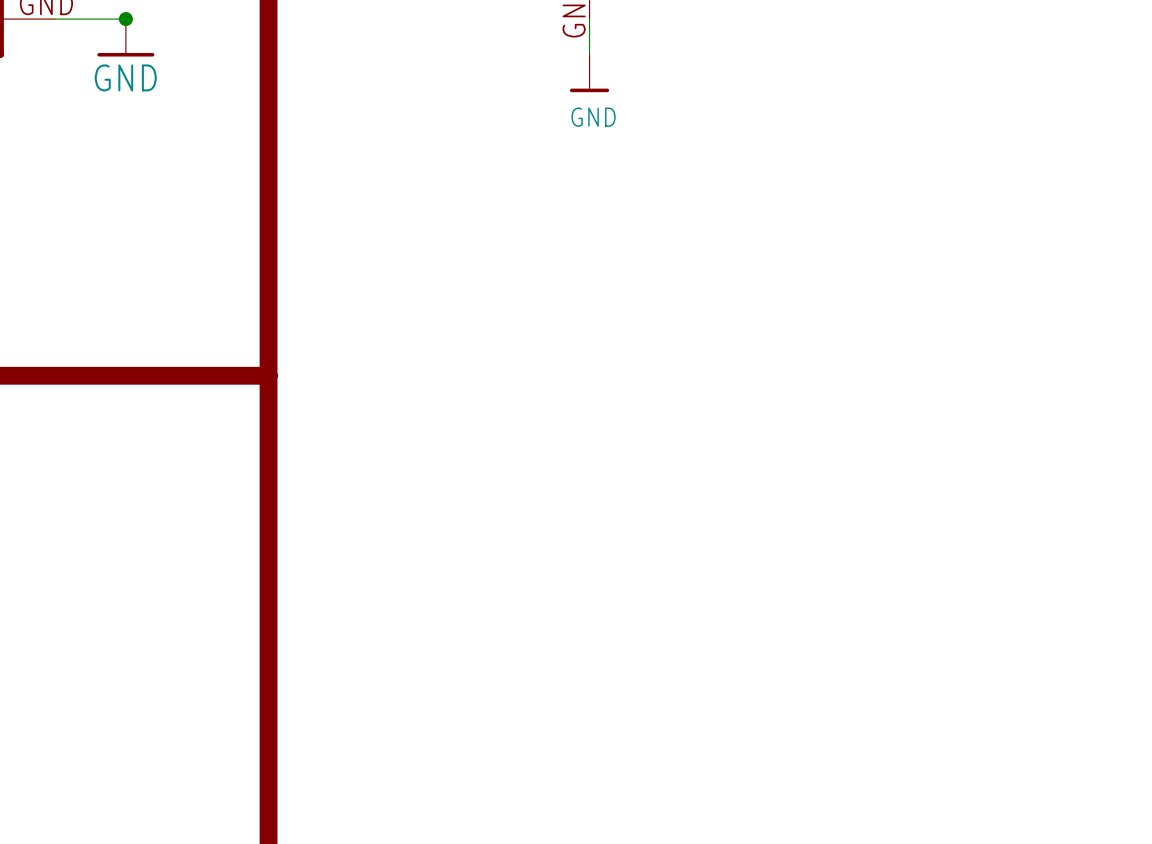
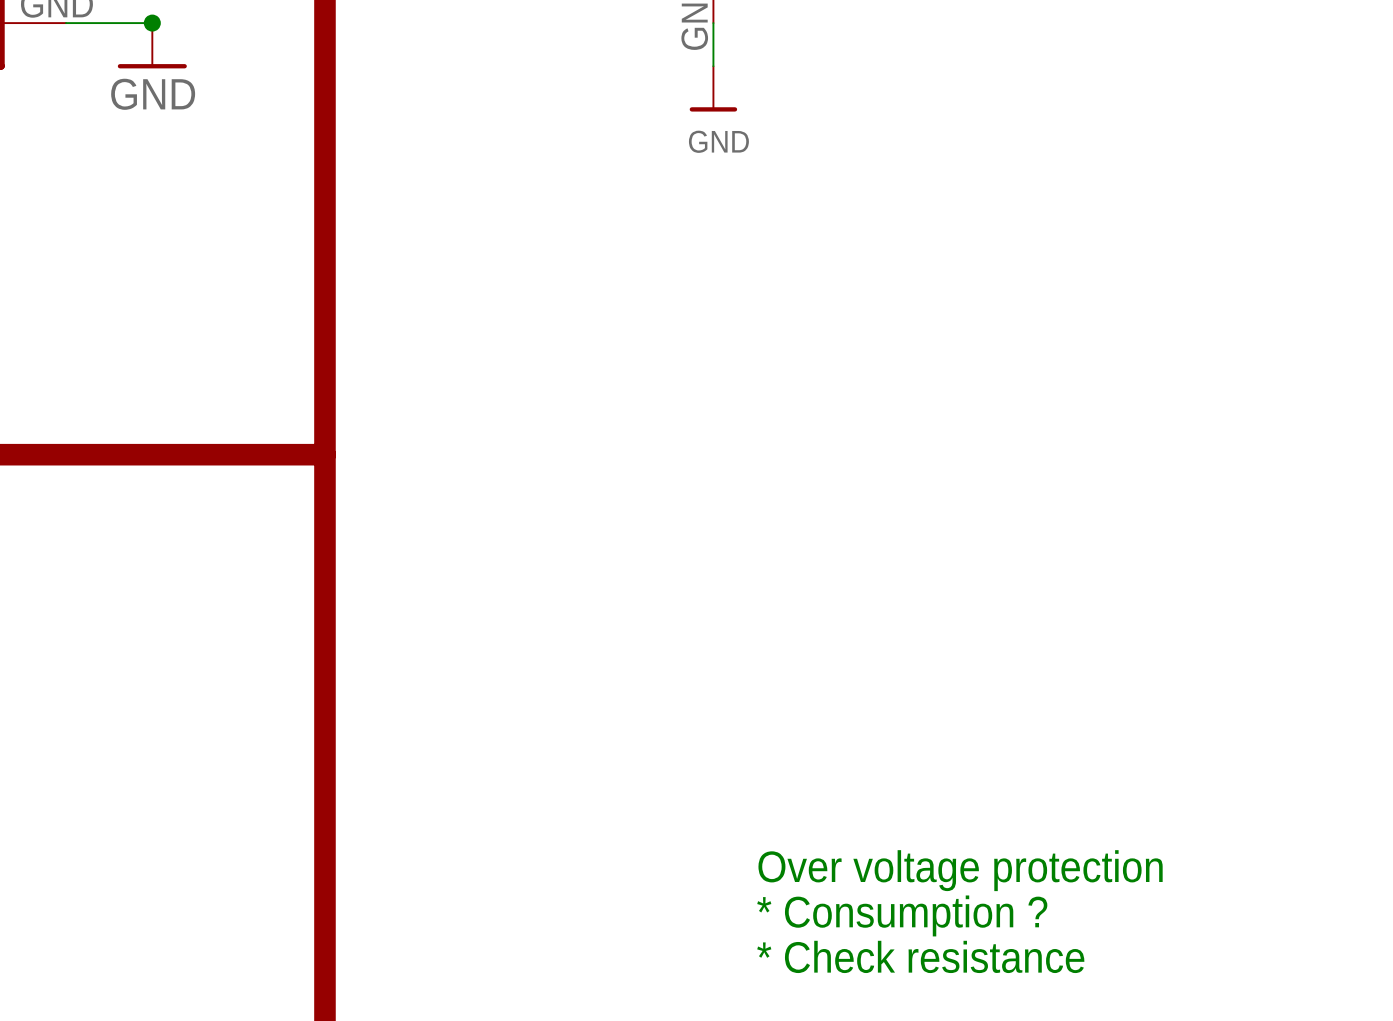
text: none -> Over voltage protection (960, 870)
text: none -> * Consumption ? (902, 915)
text: none -> * Check resistance (920, 956)

